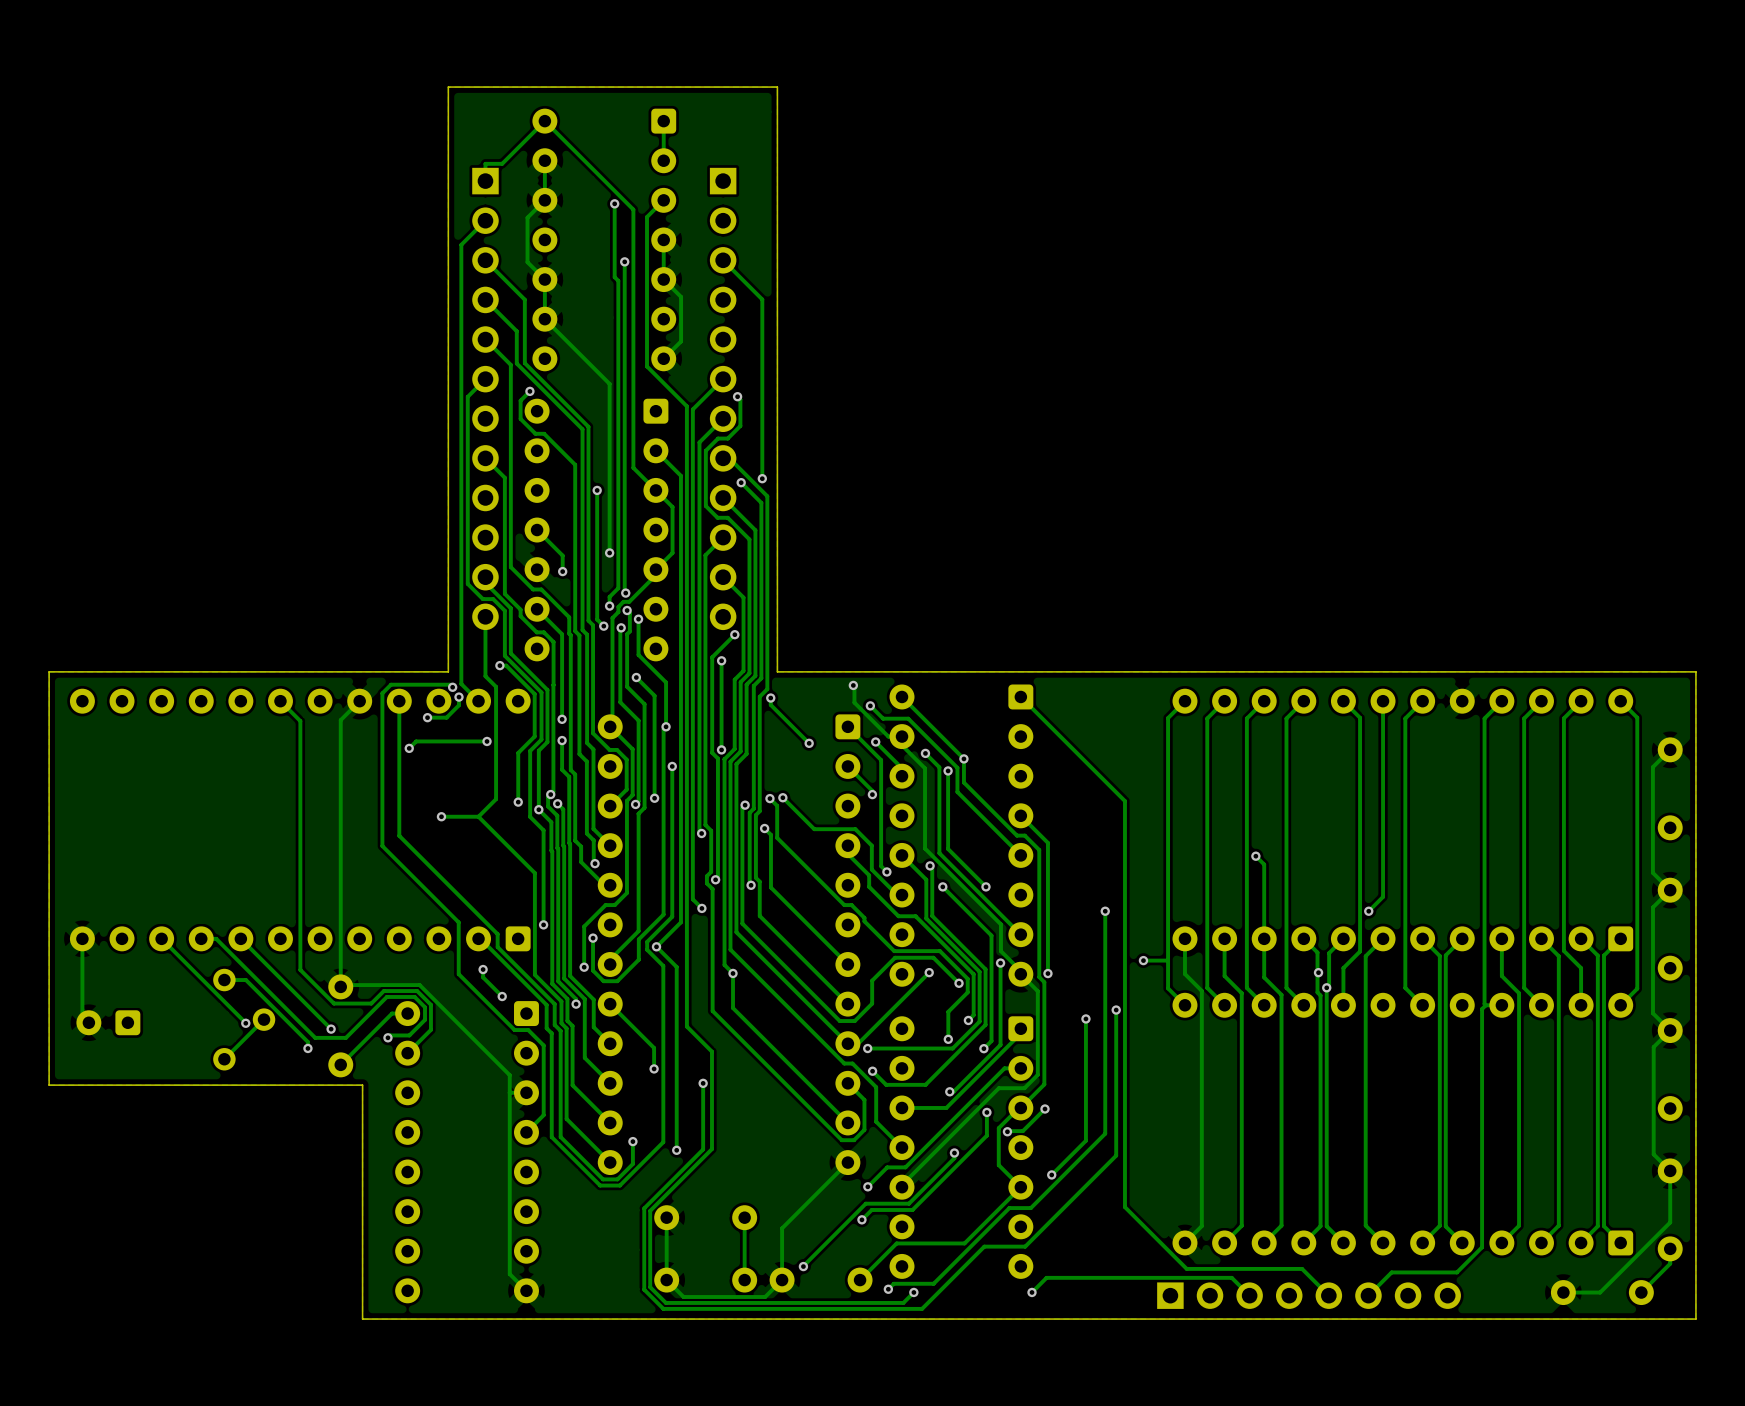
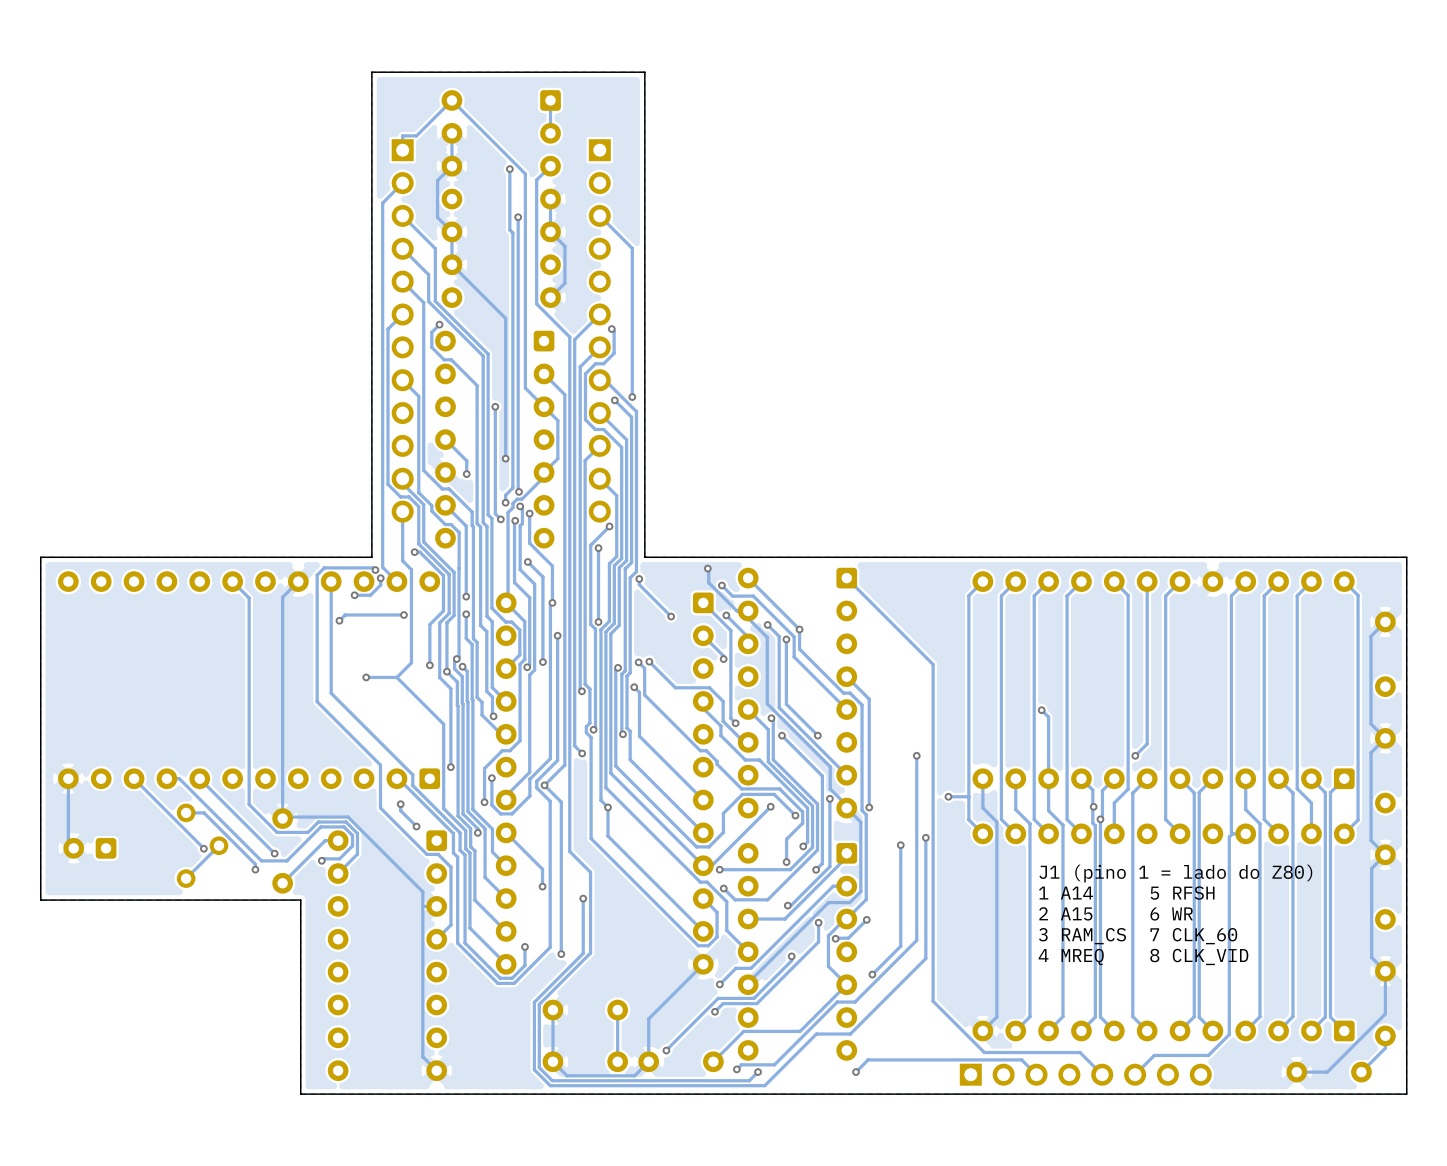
text: none -> J1 (pino 1 = lado do Z80) (1175, 873)
text: none -> 1 A14 5 RFSH (1126, 893)
text: none -> 2 A15 6 WR (1116, 913)
text: none -> 3 RAM_CS 7 CLK_60 (1138, 936)
text: none -> 4 MREQ 8 CLK_VID (1143, 956)

